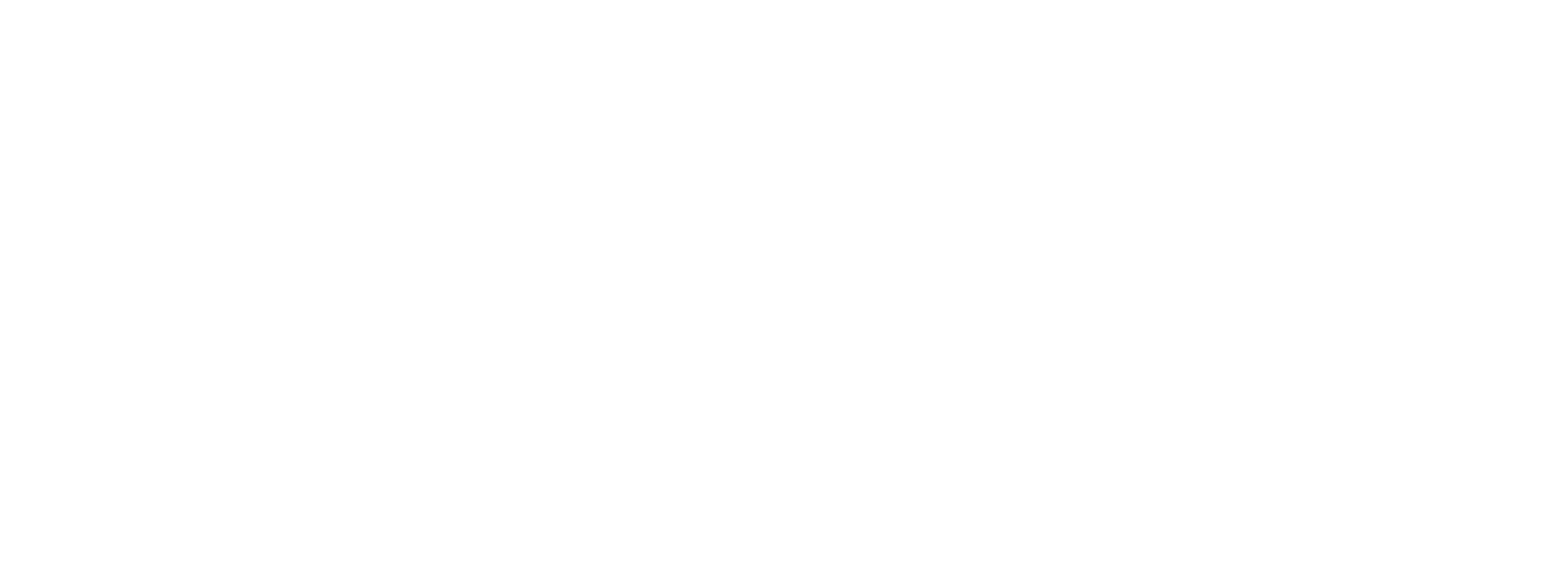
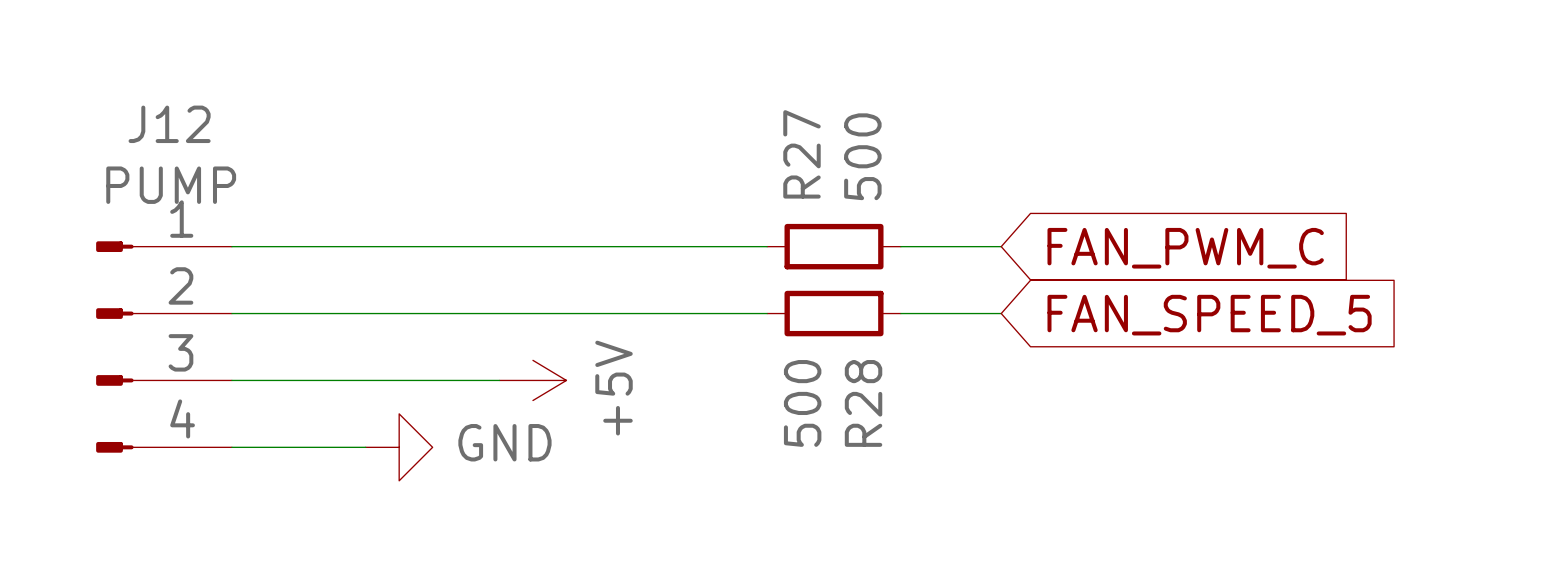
wire: none -> (231, 246) (767, 246)
R27: none -> 500 (834, 246)
wire: none -> (900, 246) (1001, 246)
global label: none -> FAN_PWM_C (1185, 248)
wire: none -> (231, 313) (767, 313)
R28: none -> 500 (834, 313)
wire: none -> (900, 313) (1001, 313)
global label: none -> FAN_SPEED_5 (1209, 315)
J12: none -> PUMP (164, 346)
wire: none -> (231, 380) (499, 380)
power symbol: none -> +5V (532, 380)
wire: none -> (231, 447) (365, 447)
power symbol: none -> GND (399, 447)

